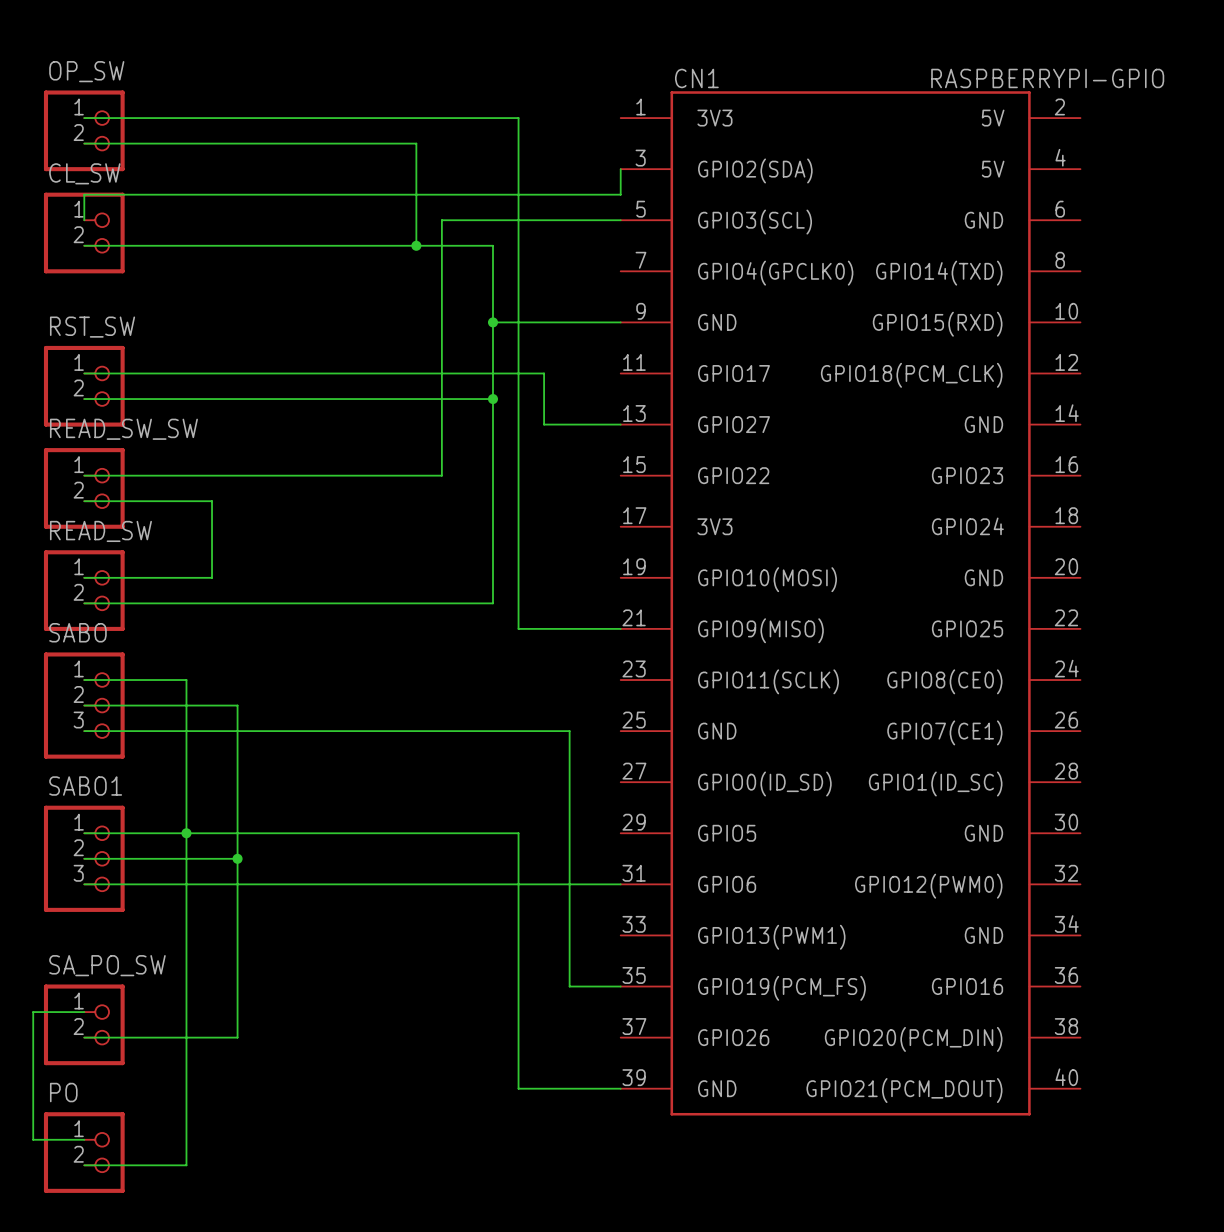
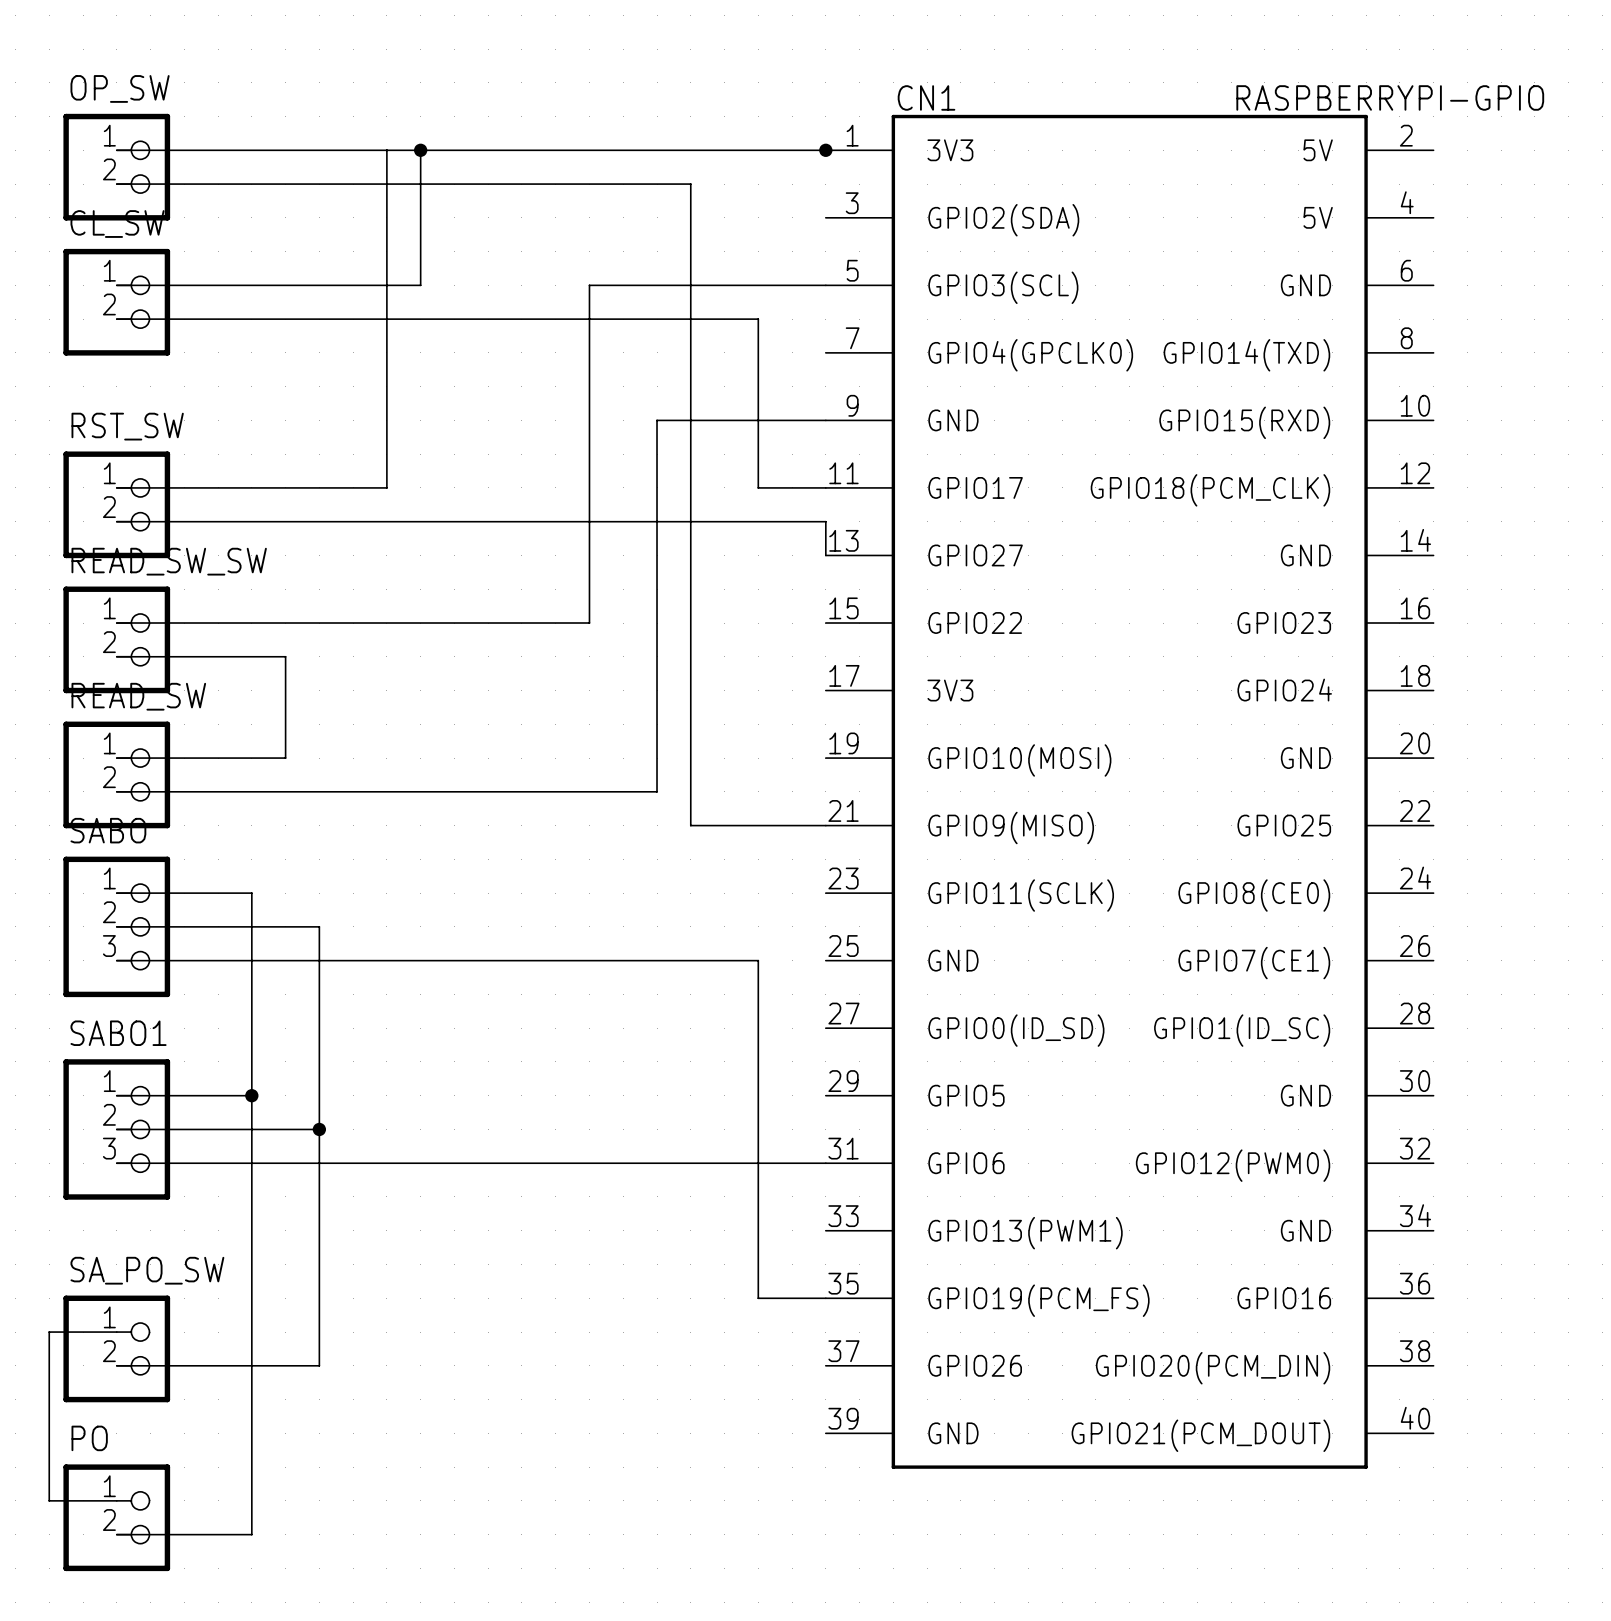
wire: none -> (386, 150) (386, 487)
junction: none -> (420, 150)
wire: (518, 118) (518, 143) -> (690, 150) (825, 150)
junction: none -> (825, 150)
wire: (416, 143) (416, 245) -> (555, 184) (690, 184)
wire: (620, 169) (620, 194) (84, 194) (84, 220) -> (420, 150) (420, 285) (116, 285)
junction: (416, 245) -> none
wire: (492, 245) (492, 322) -> (657, 319) (758, 319) (758, 487) (825, 487)
junction: (492, 322) -> none
wire: (288, 373) (544, 373) (544, 424) (620, 424) -> (657, 521) (825, 521) (825, 555)
junction: (492, 399) -> none
wire: (186, 833) (518, 833) (518, 1088) (620, 1088) -> none

